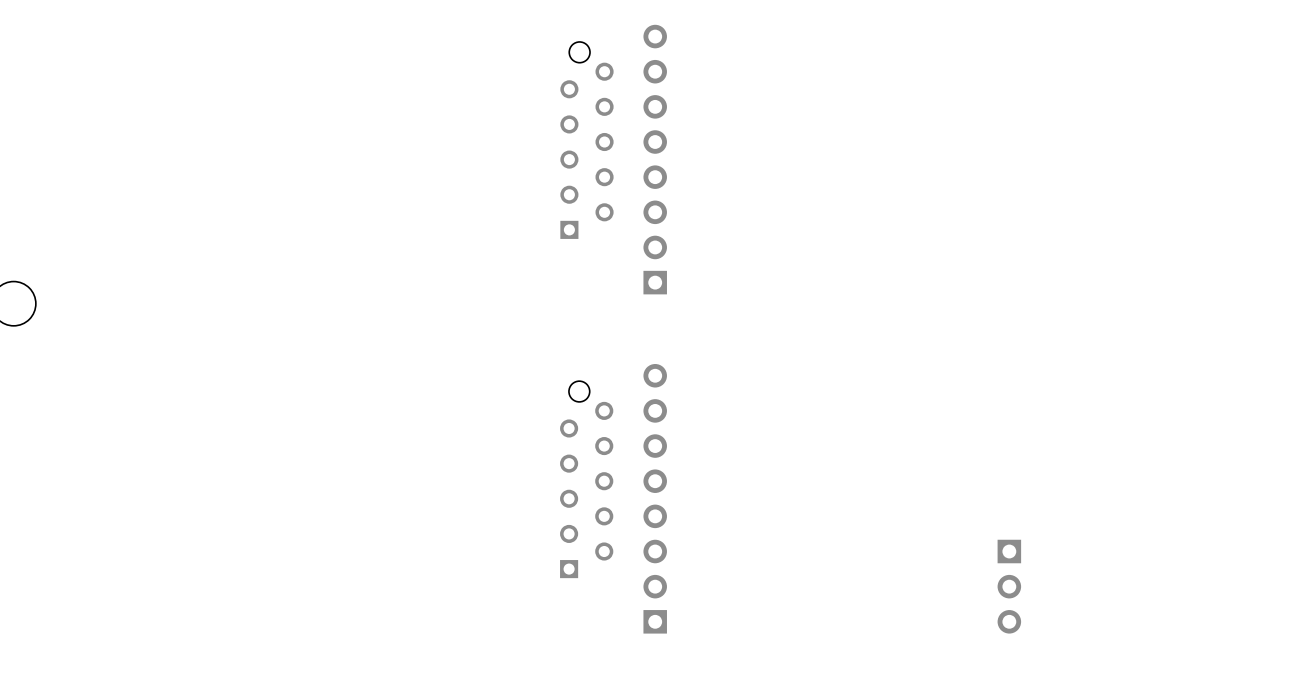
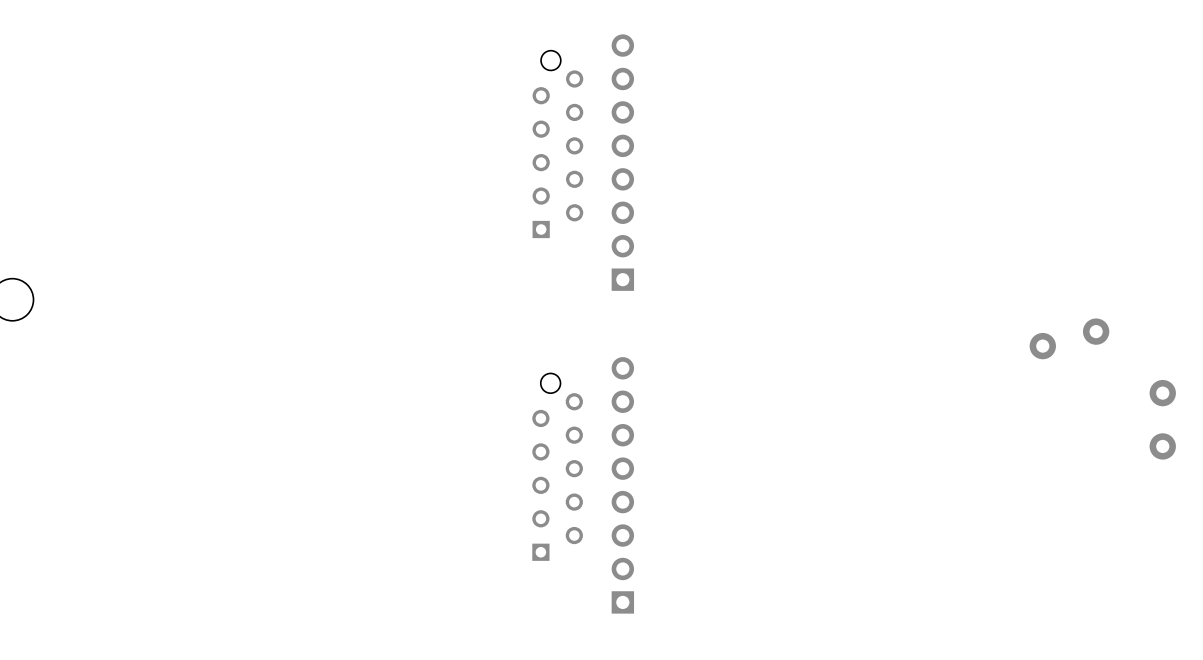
part: none -> (1096, 331)
part: none -> (1042, 346)
part: none -> (1162, 393)
part: none -> (1162, 446)
part: (1009, 586) -> none

